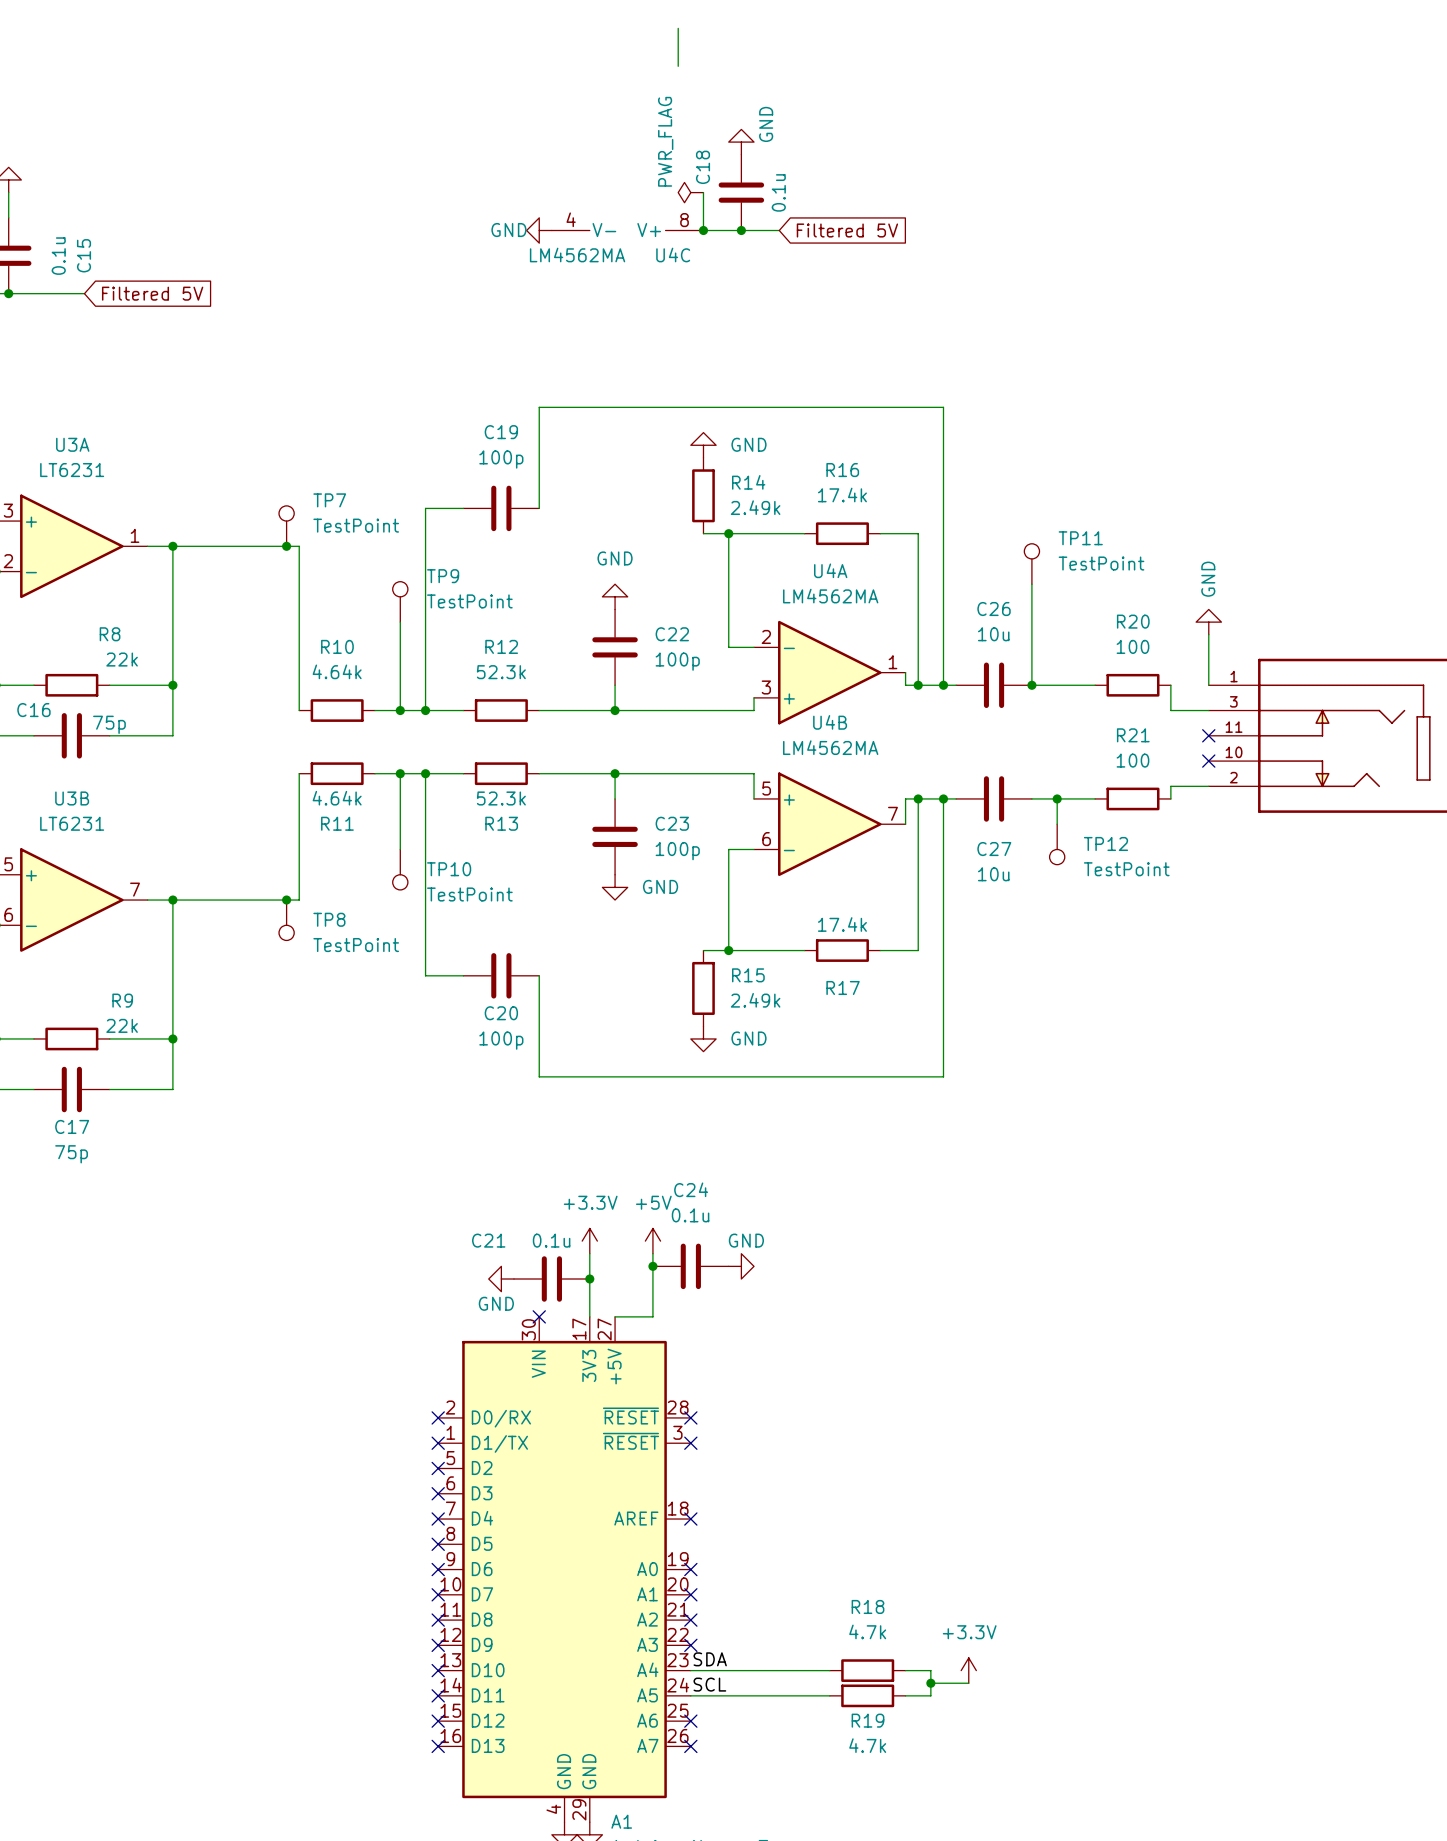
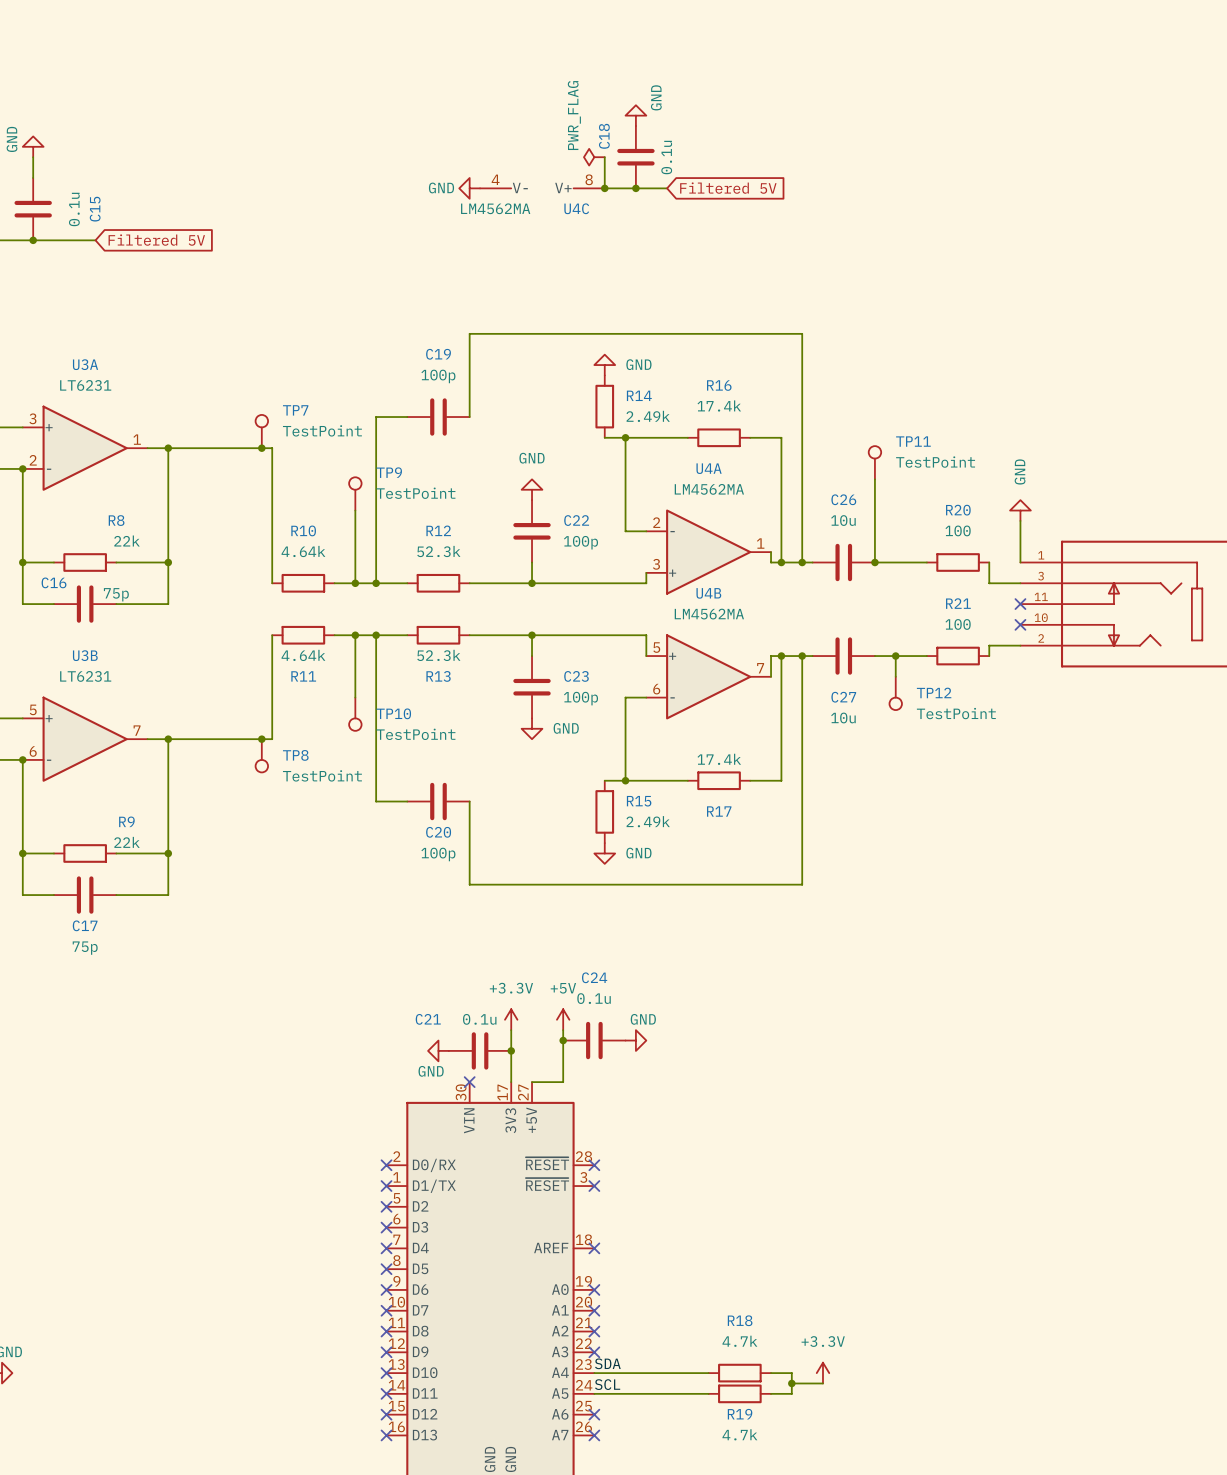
wire: (678, 28) (678, 66) -> none

